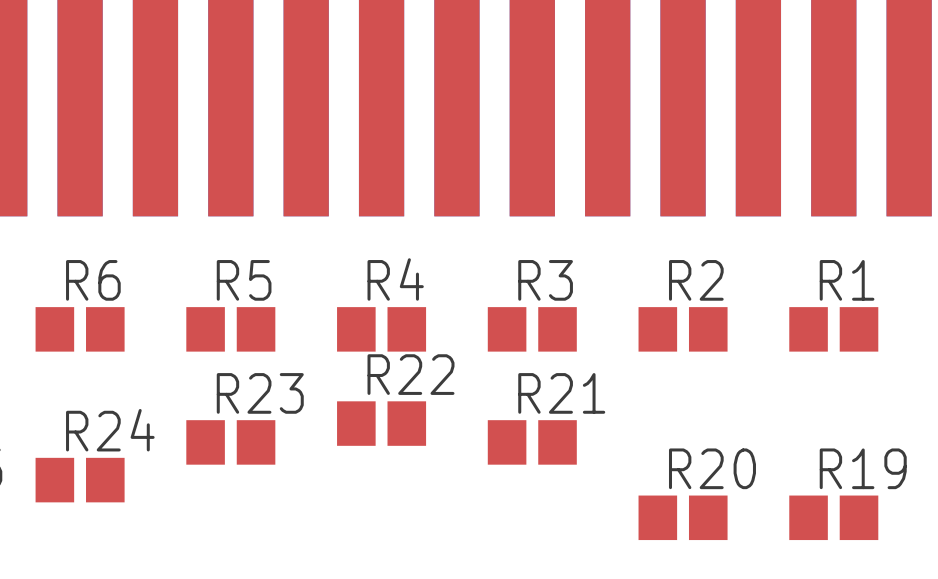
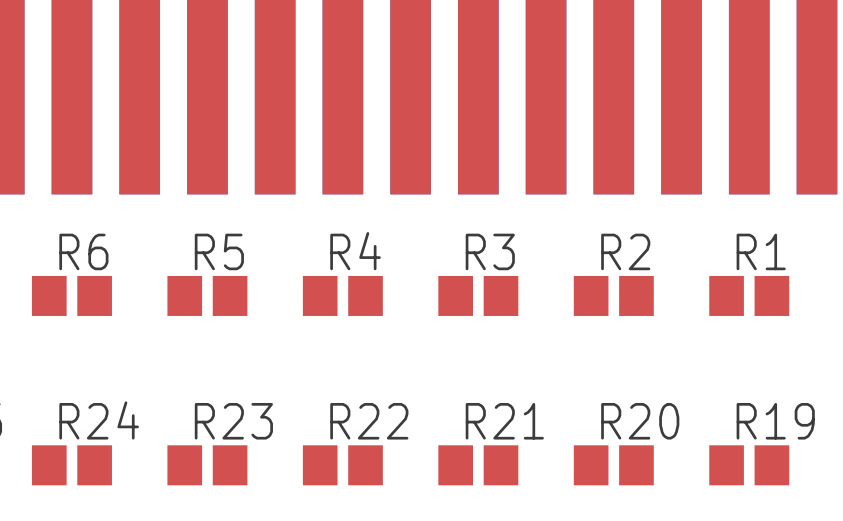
R22 position: (381, 423) -> (342, 465)
R23 position: (230, 442) -> (207, 465)
R21 position: (532, 442) -> (478, 465)
R24 position: (80, 480) -> (71, 465)

